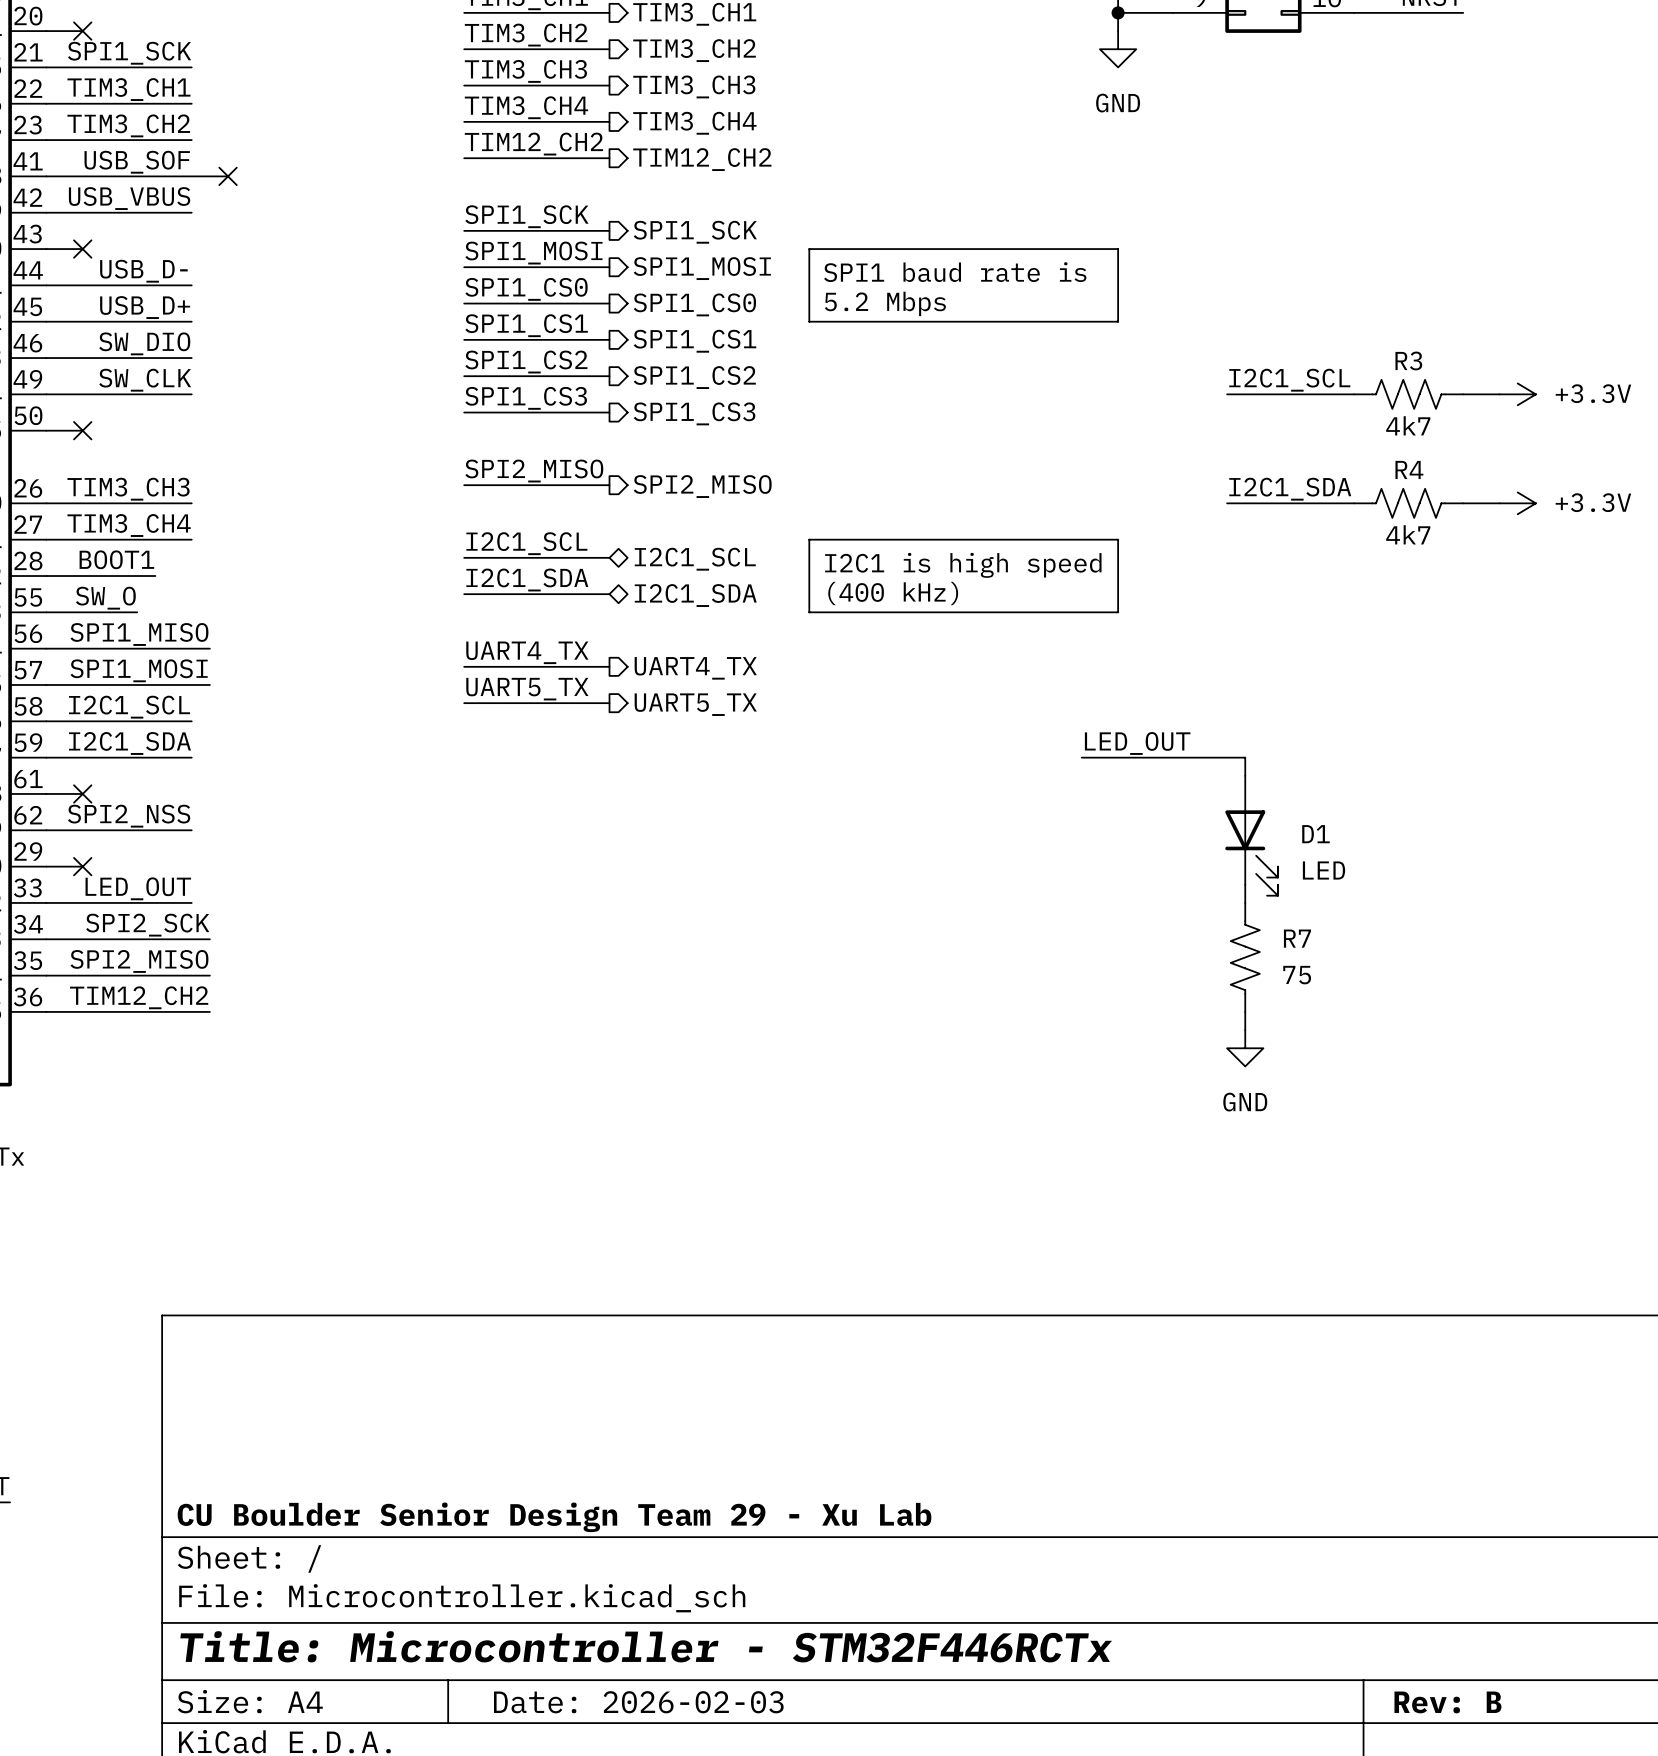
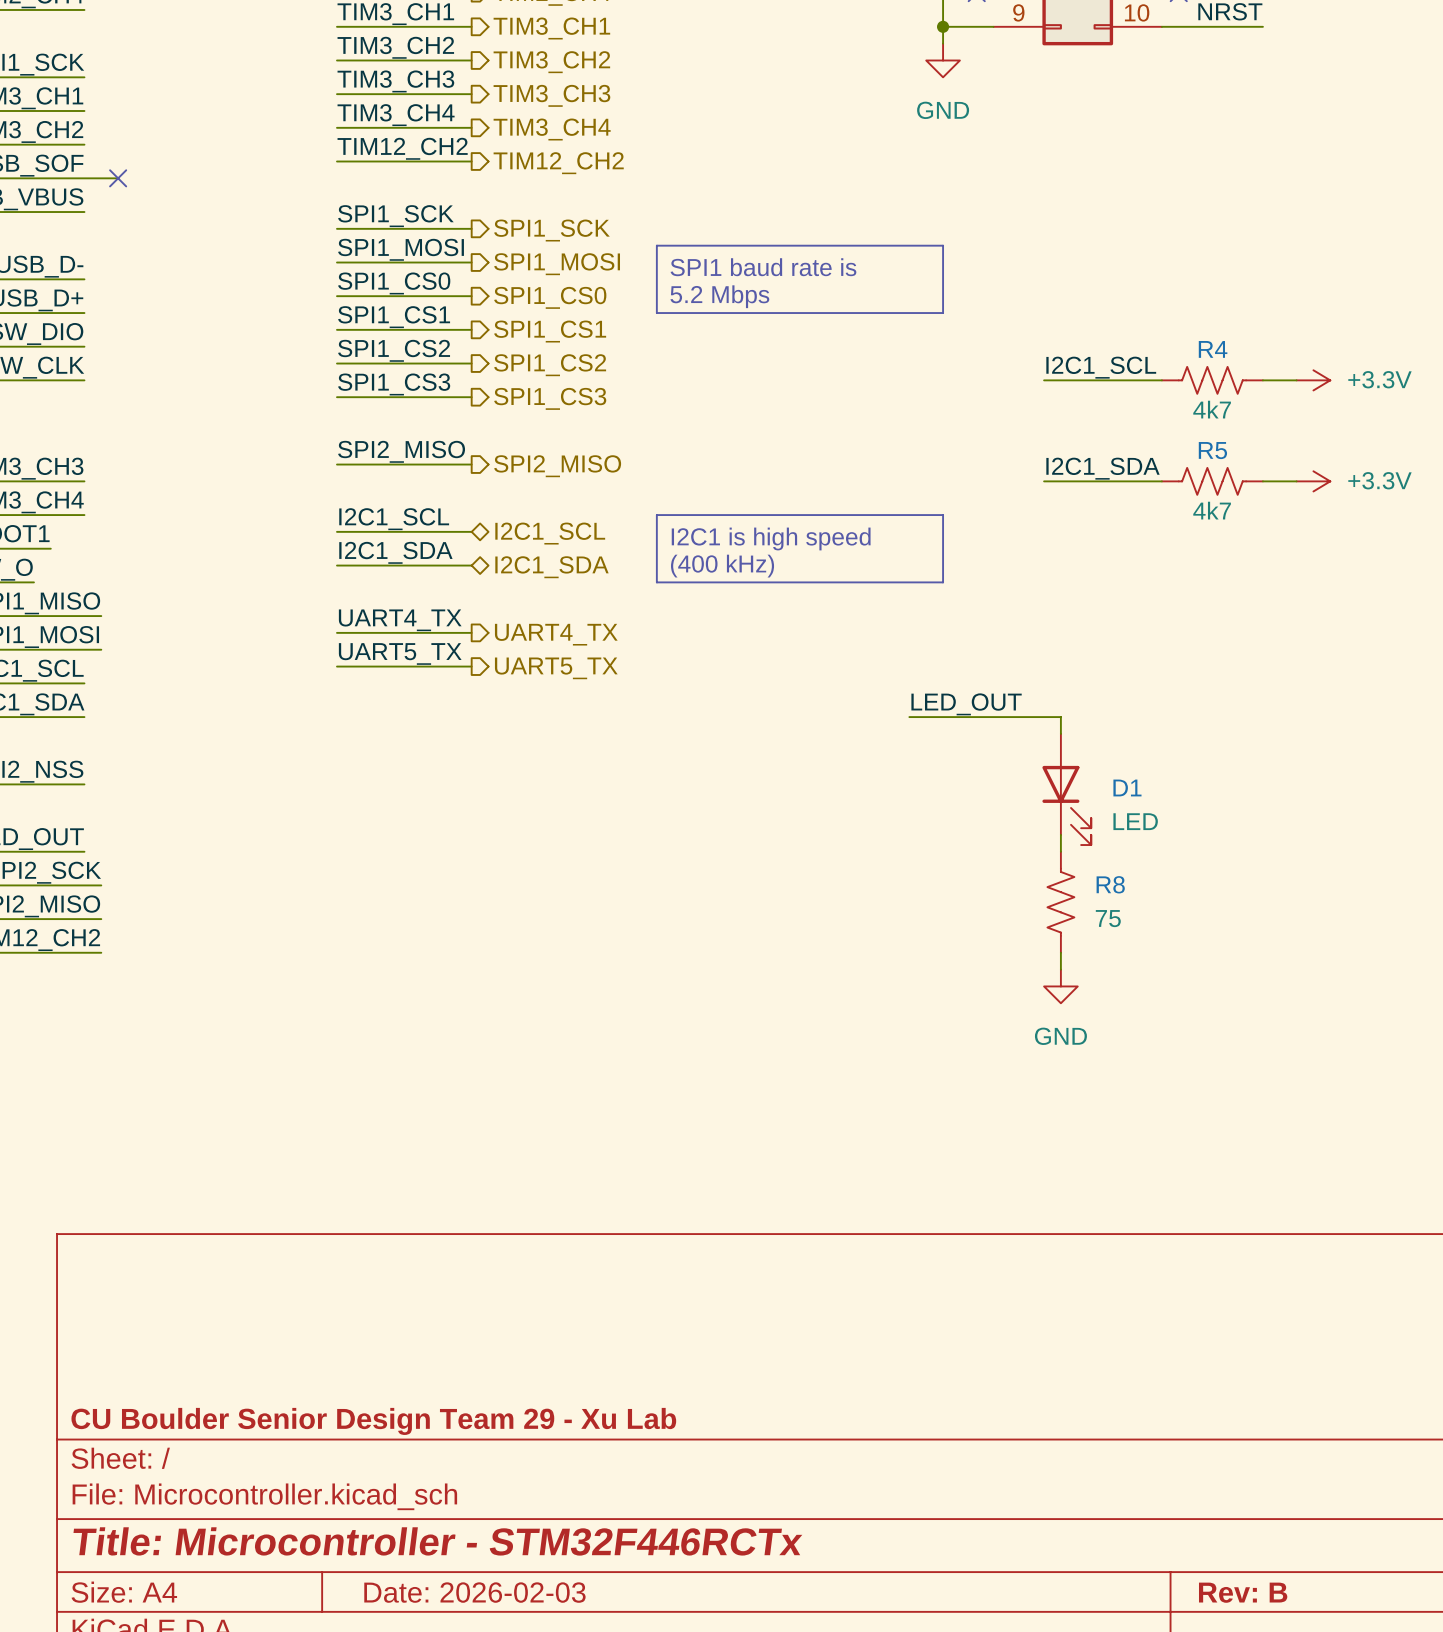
R3 name: R3 (1408, 360) -> R4 (1213, 349)
R4 name: R4 (1409, 469) -> R5 (1212, 450)
R7 name: R7 (1297, 938) -> R8 (1110, 884)

